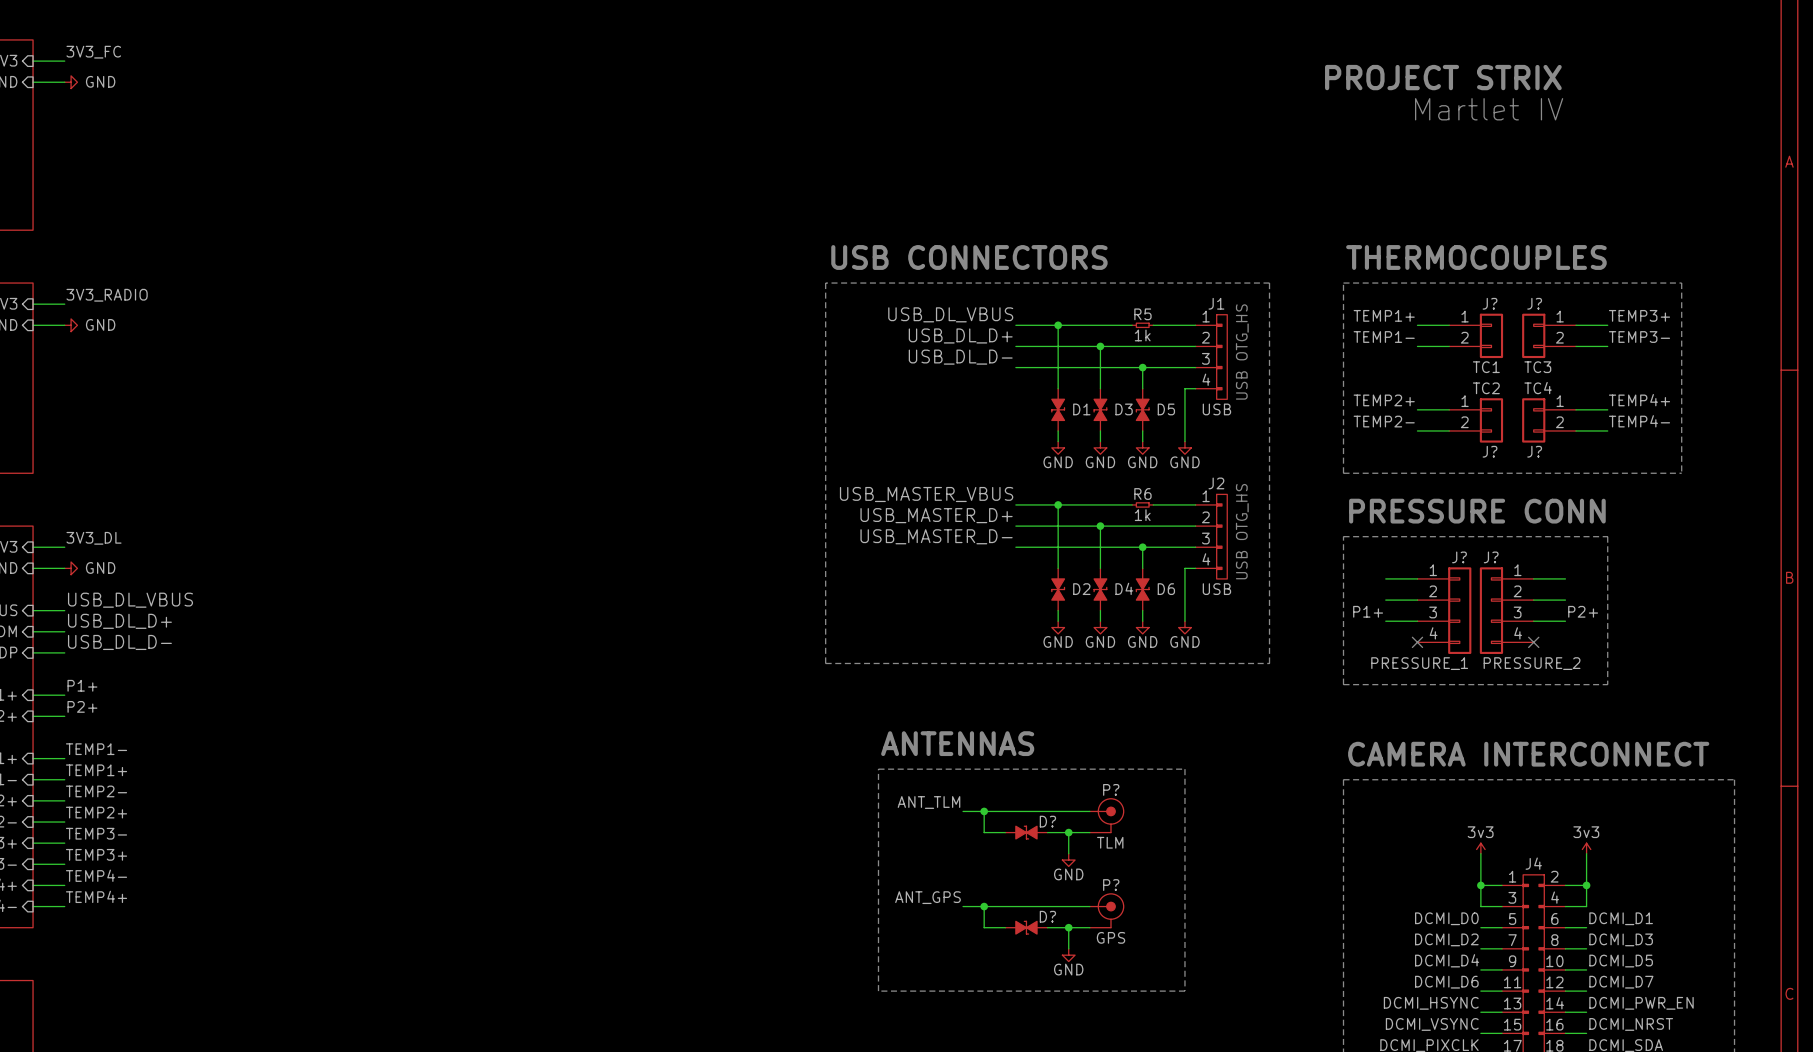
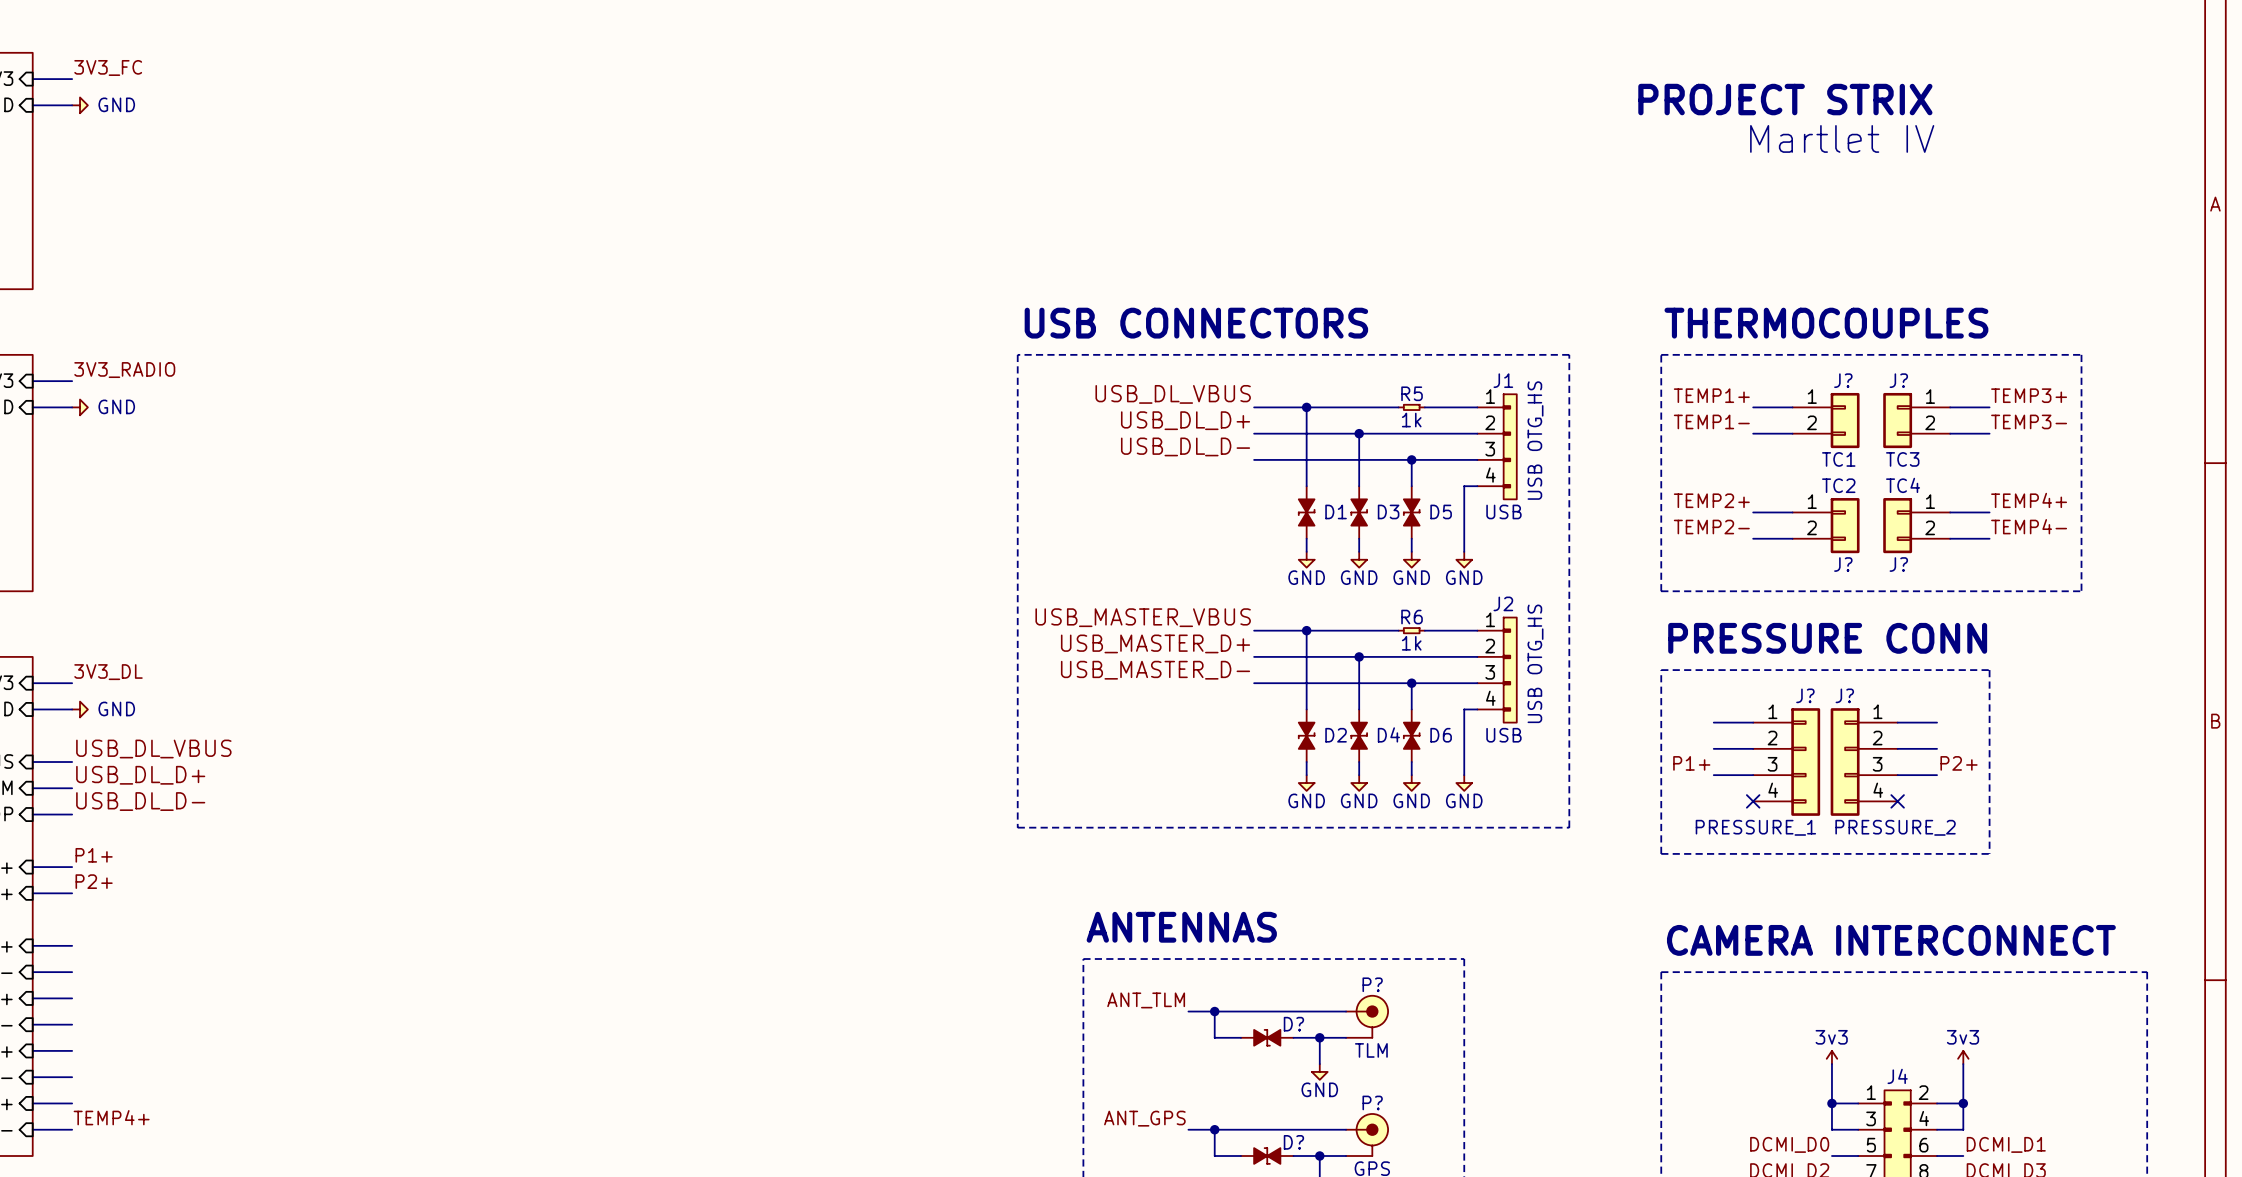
label: TEMP1- (96, 749) -> none
label: TEMP1+ (96, 770) -> none
label: TEMP2- (96, 791) -> none
label: TEMP2+ (96, 812) -> none
label: TEMP3- (96, 833) -> none
label: TEMP3+ (96, 854) -> none
label: TEMP4- (96, 875) -> none

